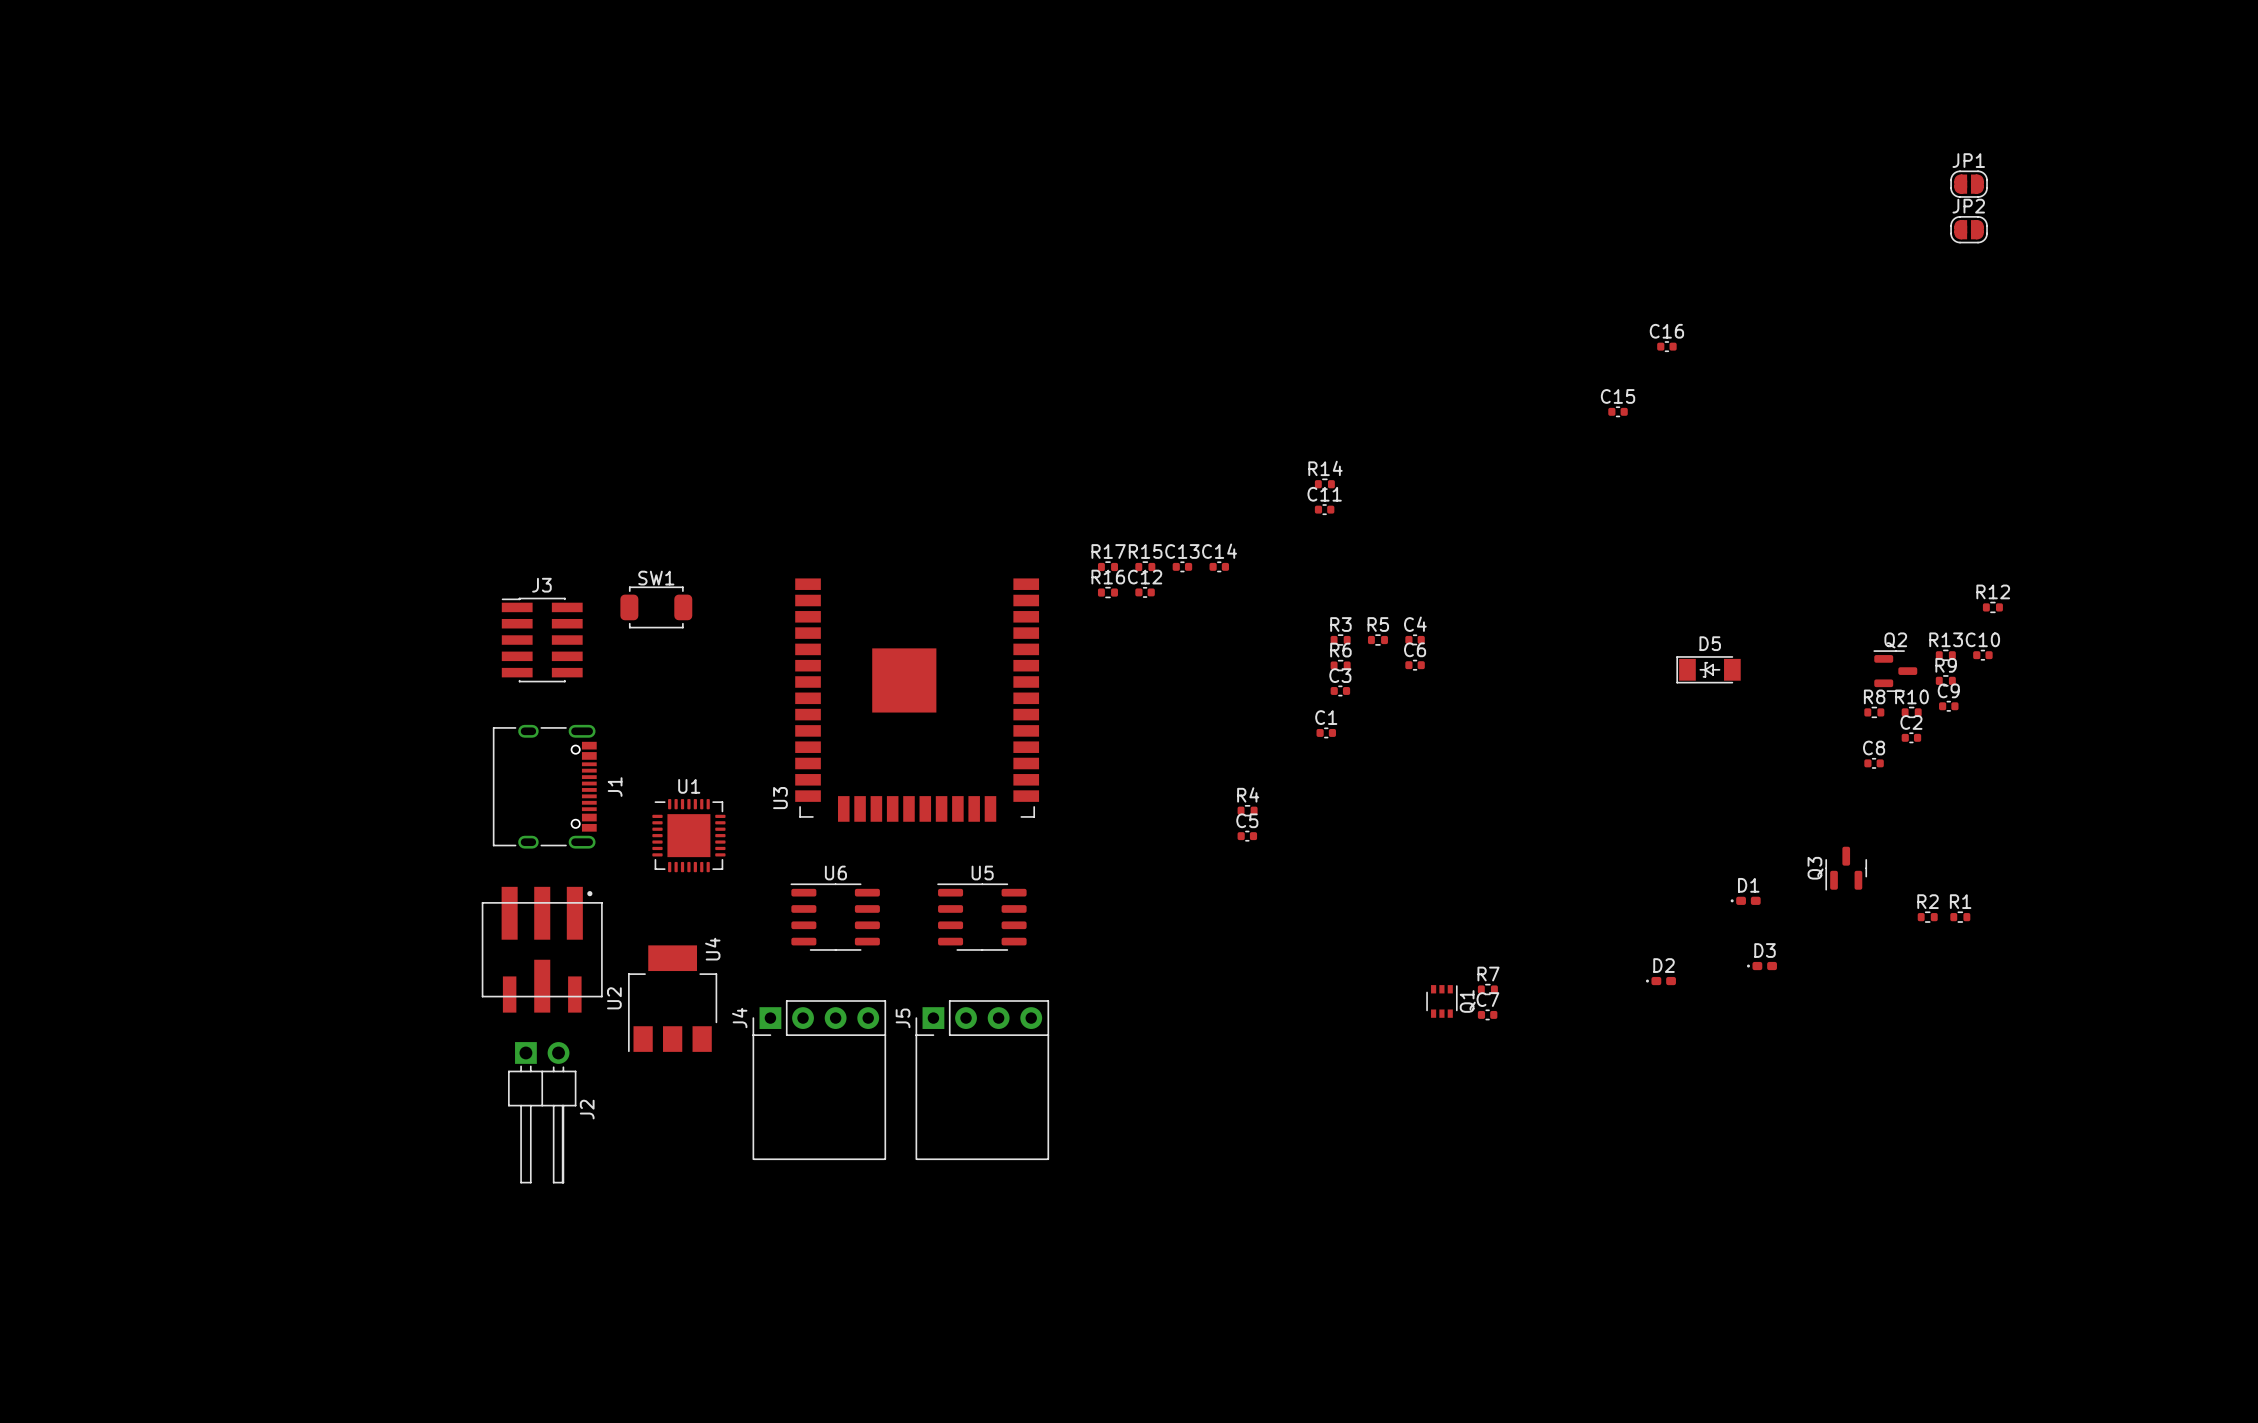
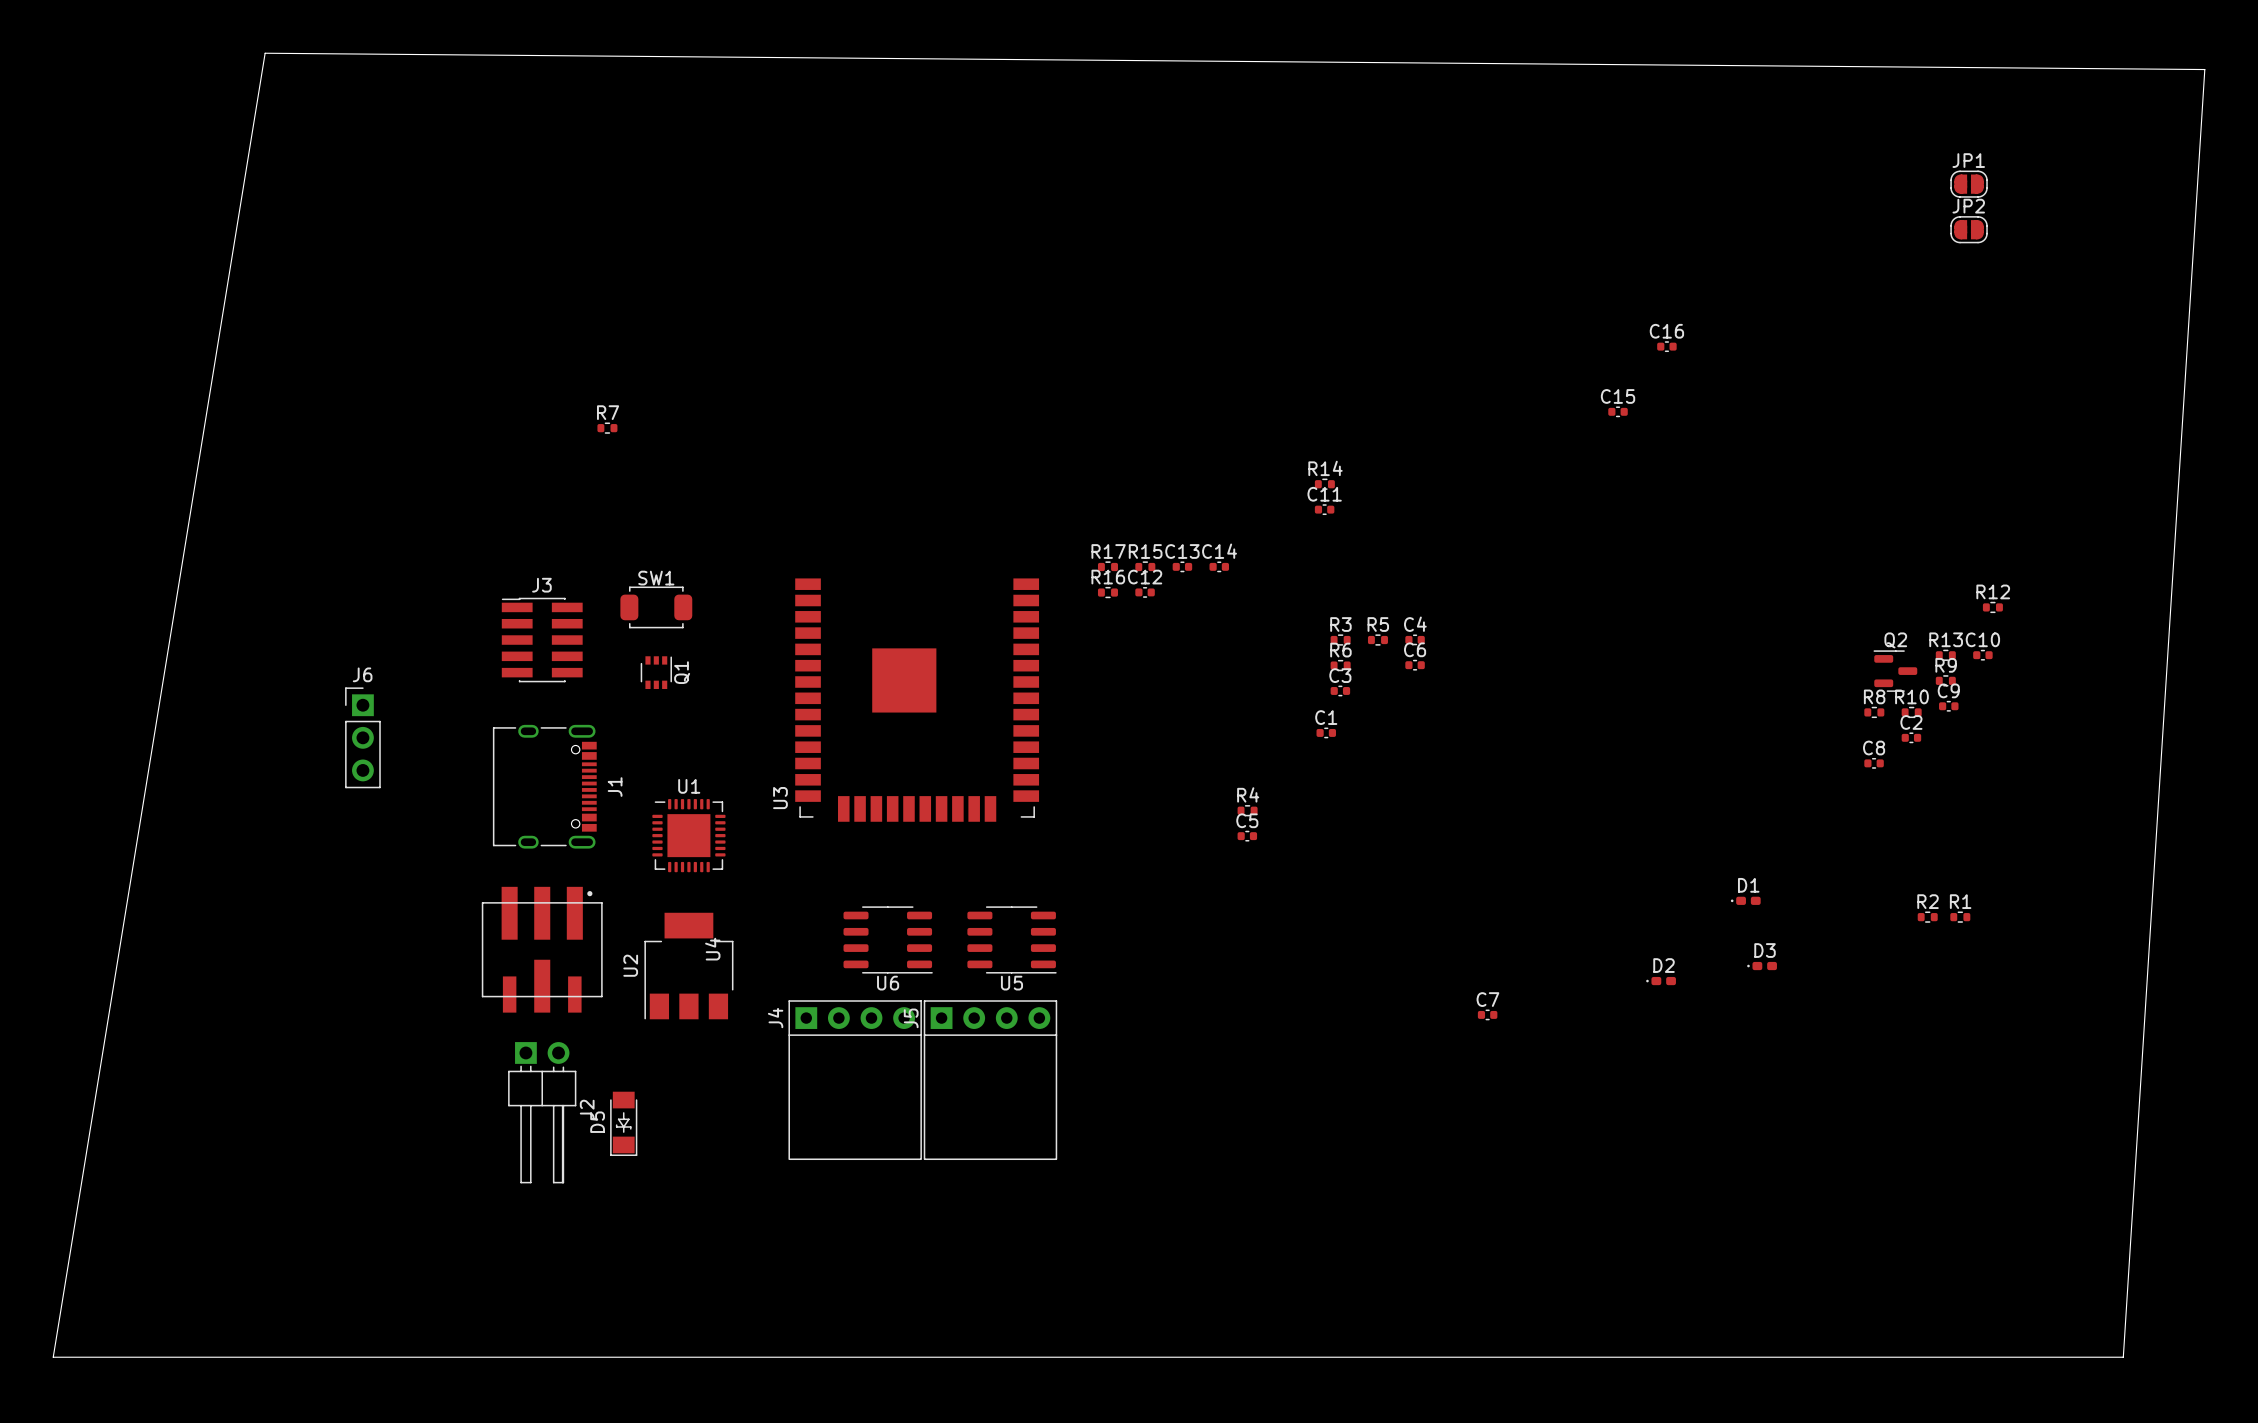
board edge: none -> (265, 53) (2204, 69) (2123, 1357) (53, 1357) (265, 53)
D5 rotation: 0° (1708, 669) -> 90° counterclockwise (623, 1123)
D5 position: (1708, 669) -> (623, 1123)
J6: none -> (362, 737)
Q3: (1846, 868) -> none
U6 rotation: 0° (835, 917) -> 180° (888, 939)
U6 position: (835, 917) -> (888, 939)
U5 rotation: 0° (981, 917) -> 180° (1012, 939)
R7 position: (1487, 989) -> (607, 428)
U2 position: (672, 998) -> (688, 966)
J4 footprint: [752, 1000, 887, 1161] -> [788, 1000, 922, 1161]
J5 footprint: [915, 1000, 1050, 1161] -> [923, 1000, 1058, 1161]
Q1 position: (1441, 1001) -> (656, 672)

